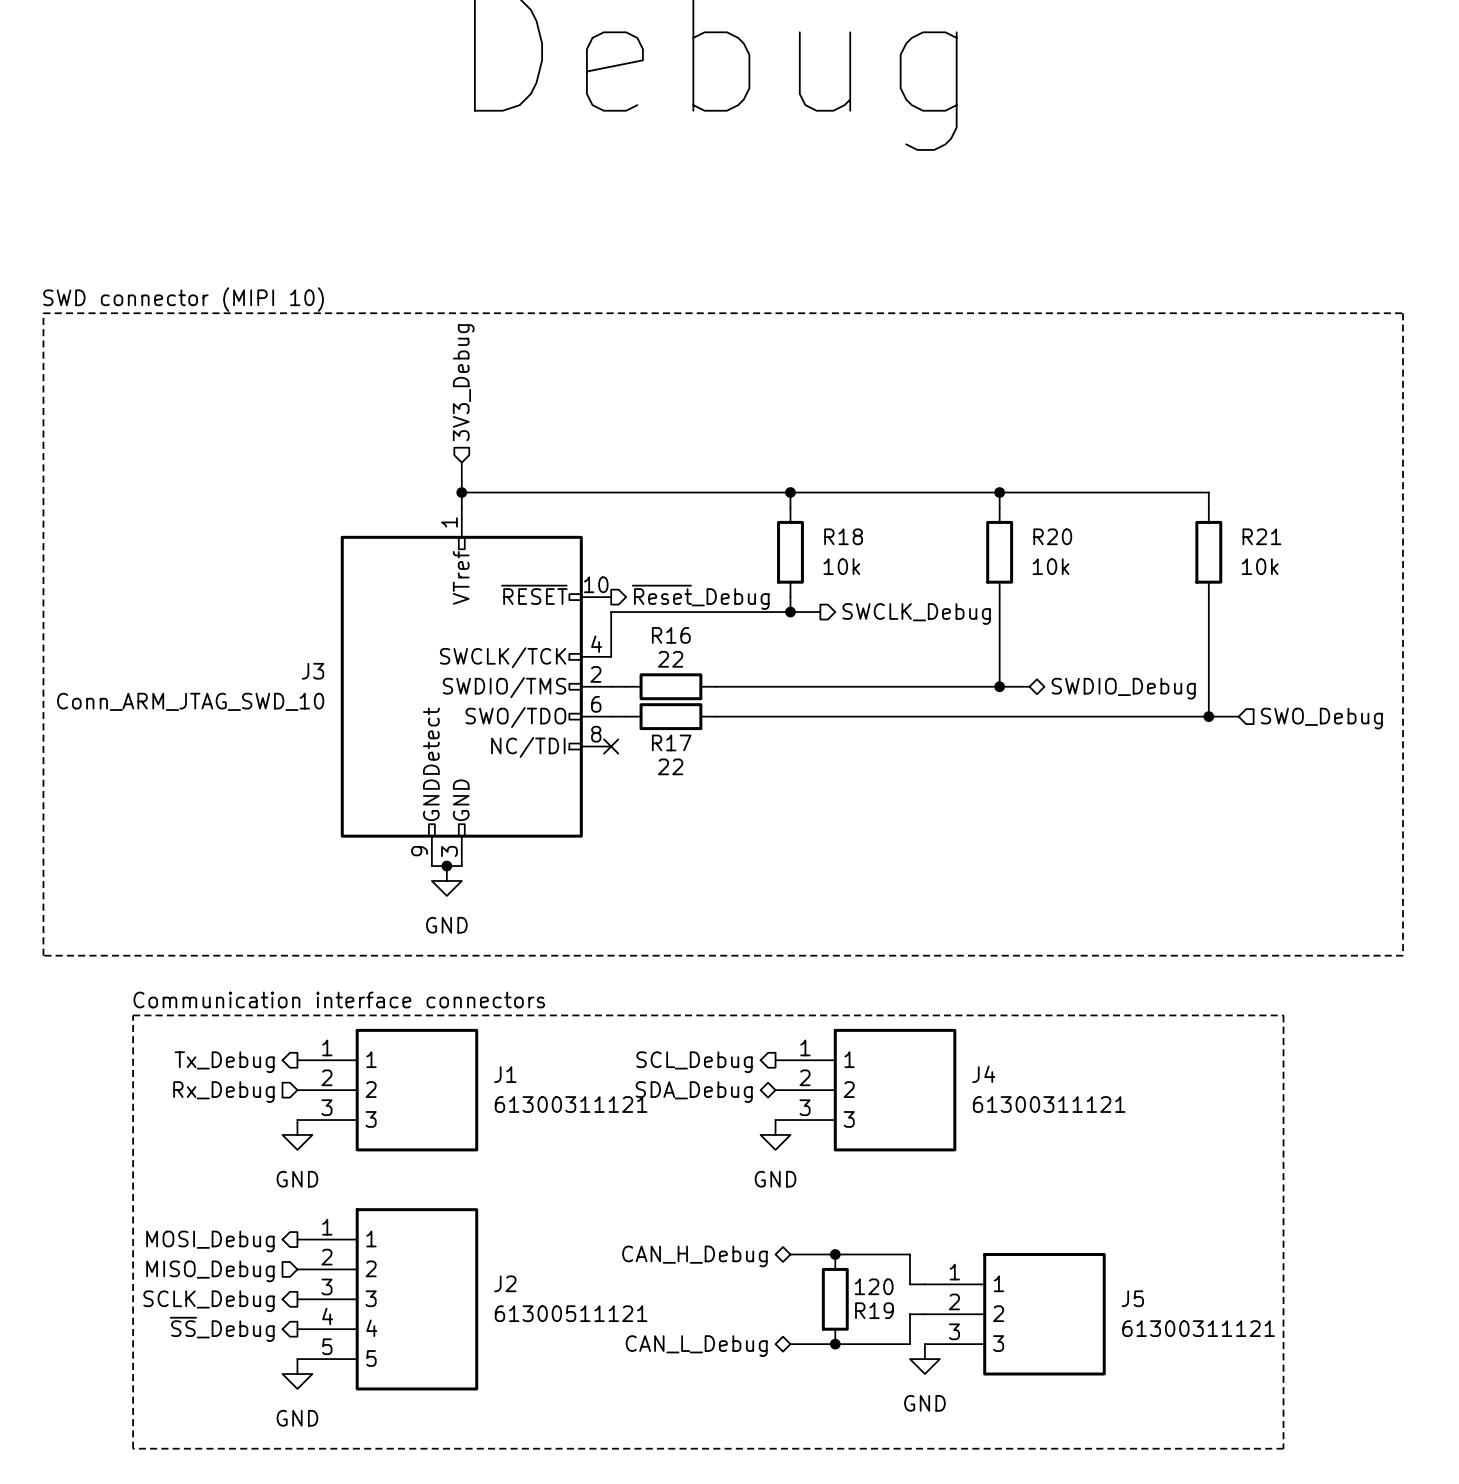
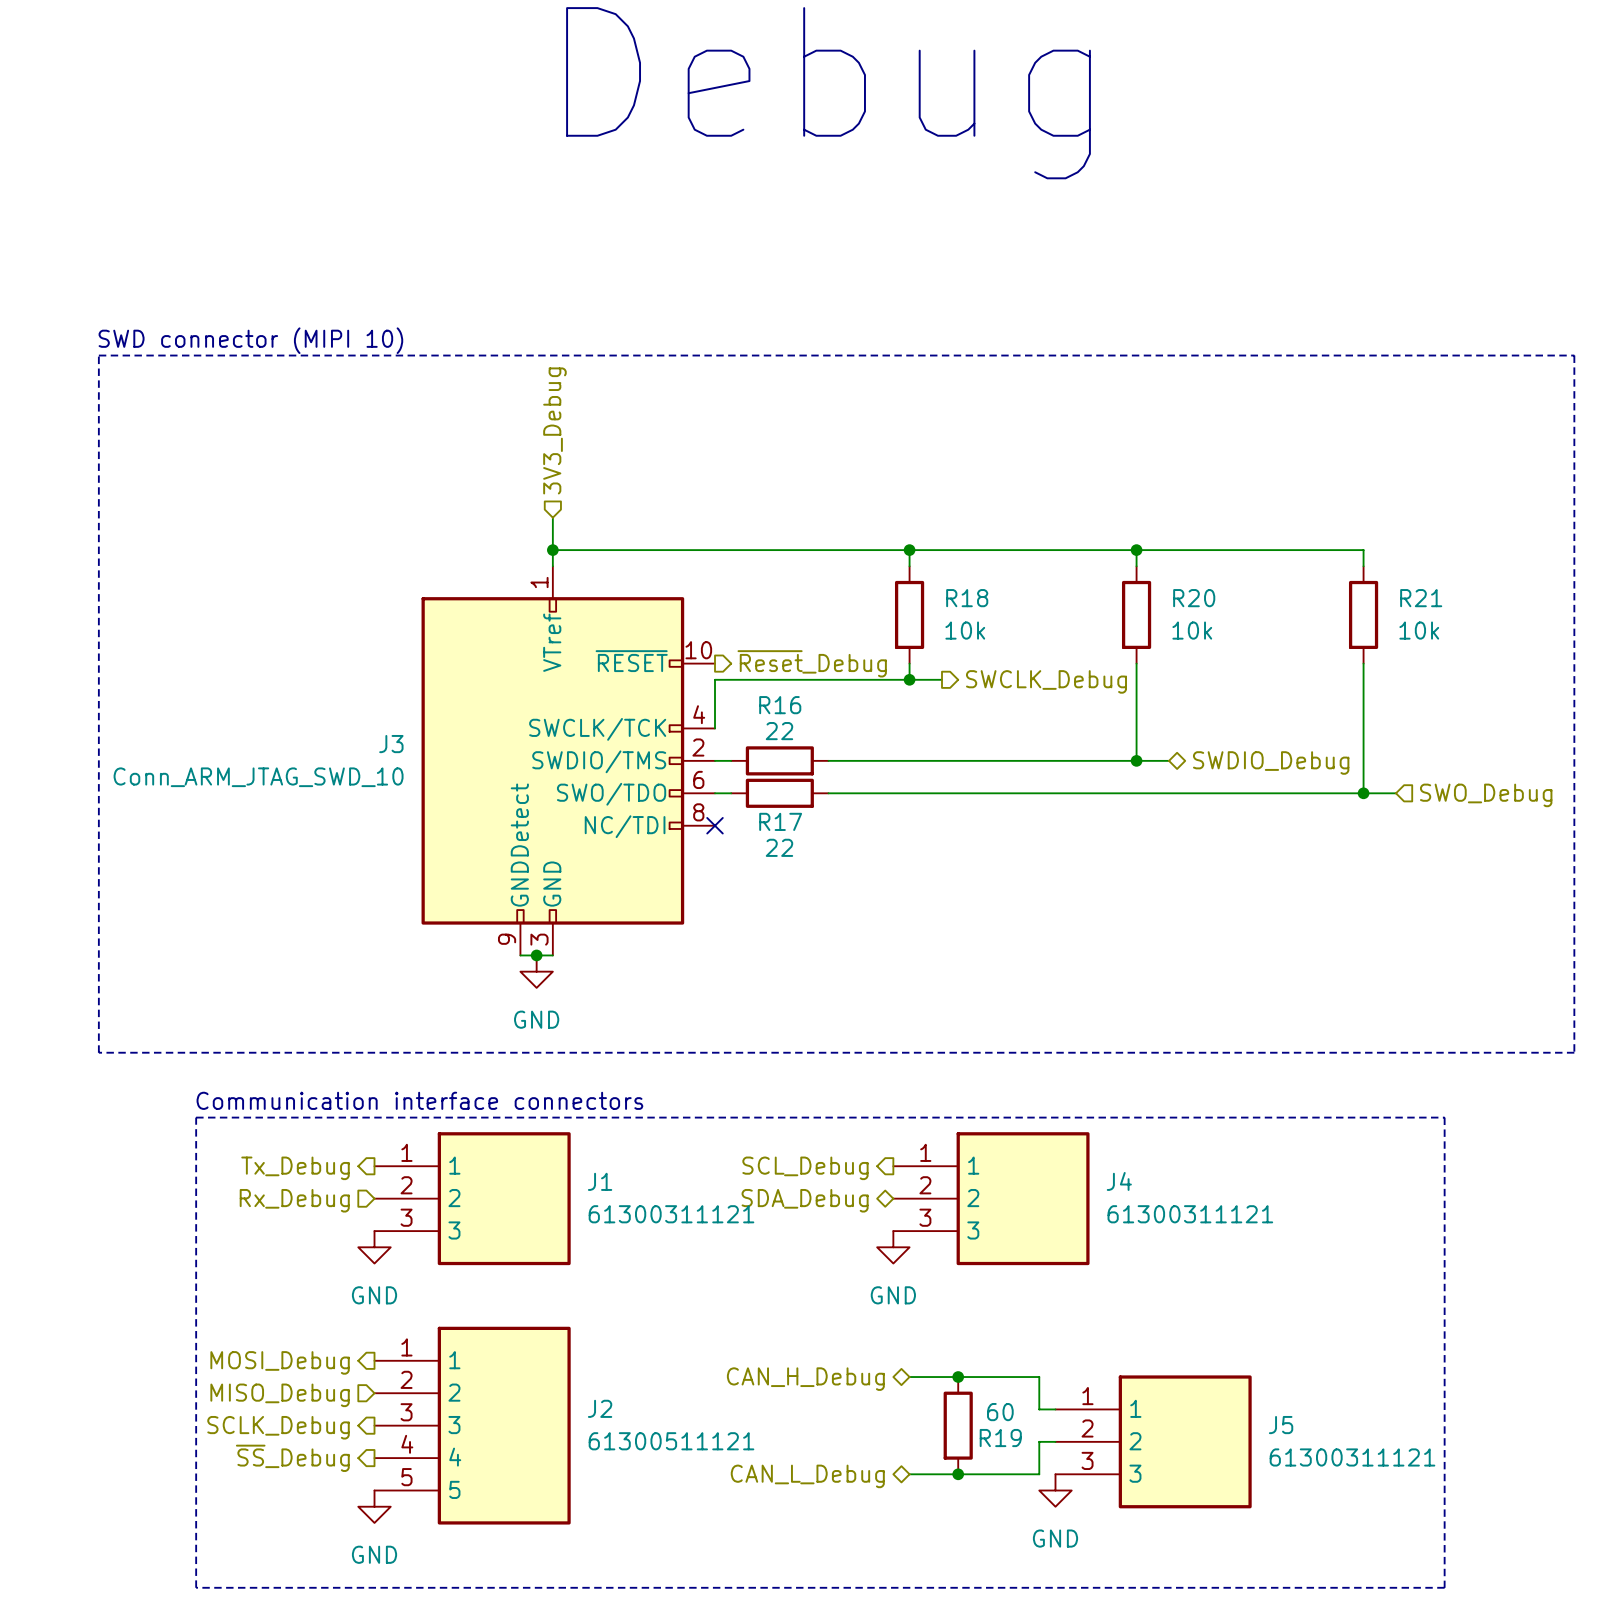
R19 value: 120 (874, 1286) -> 60 (1000, 1412)

